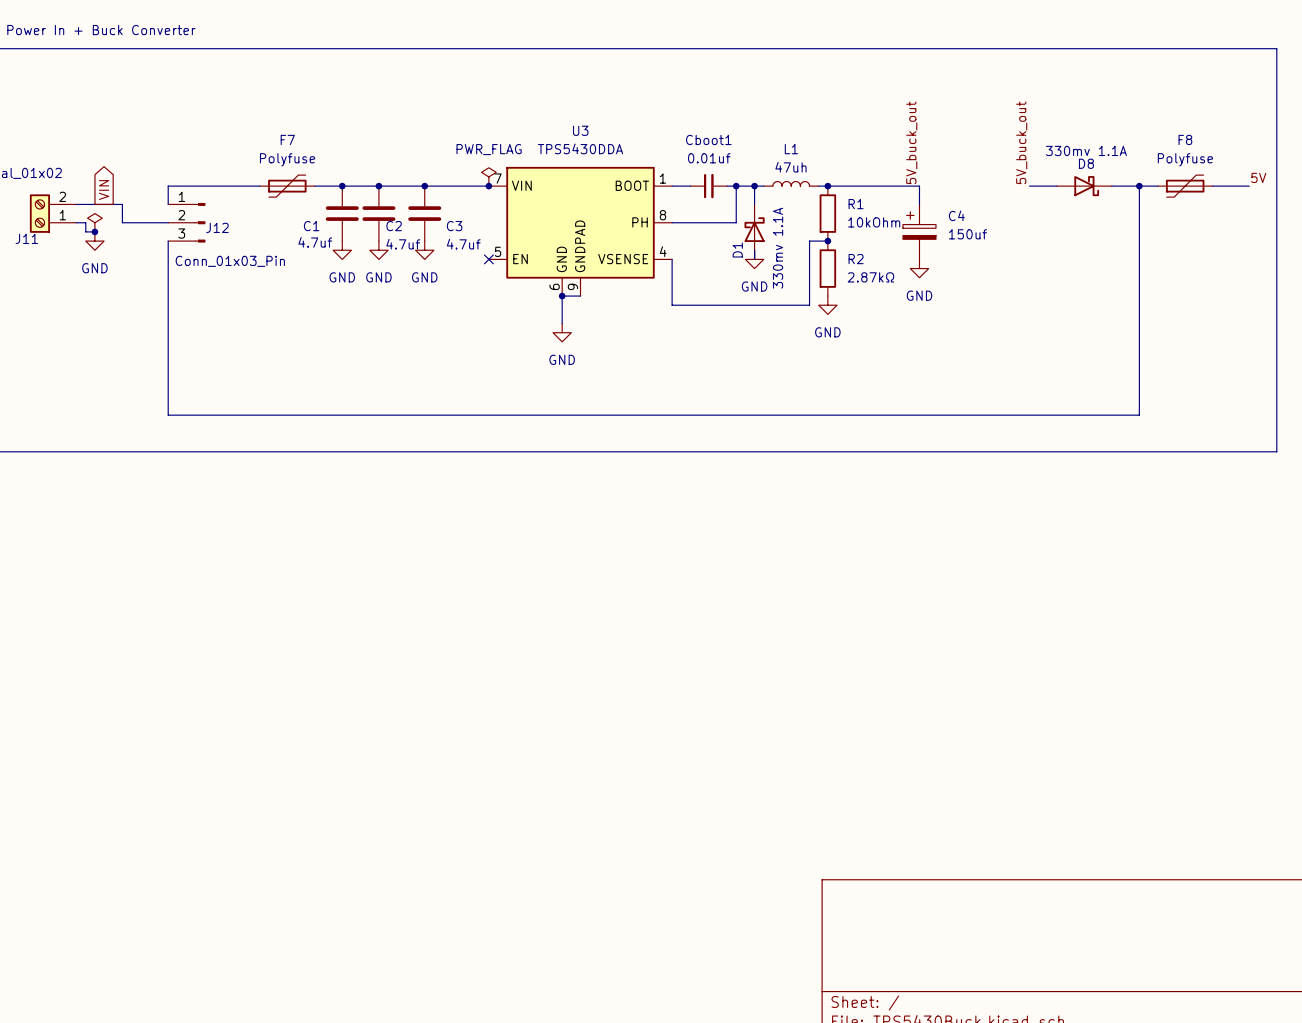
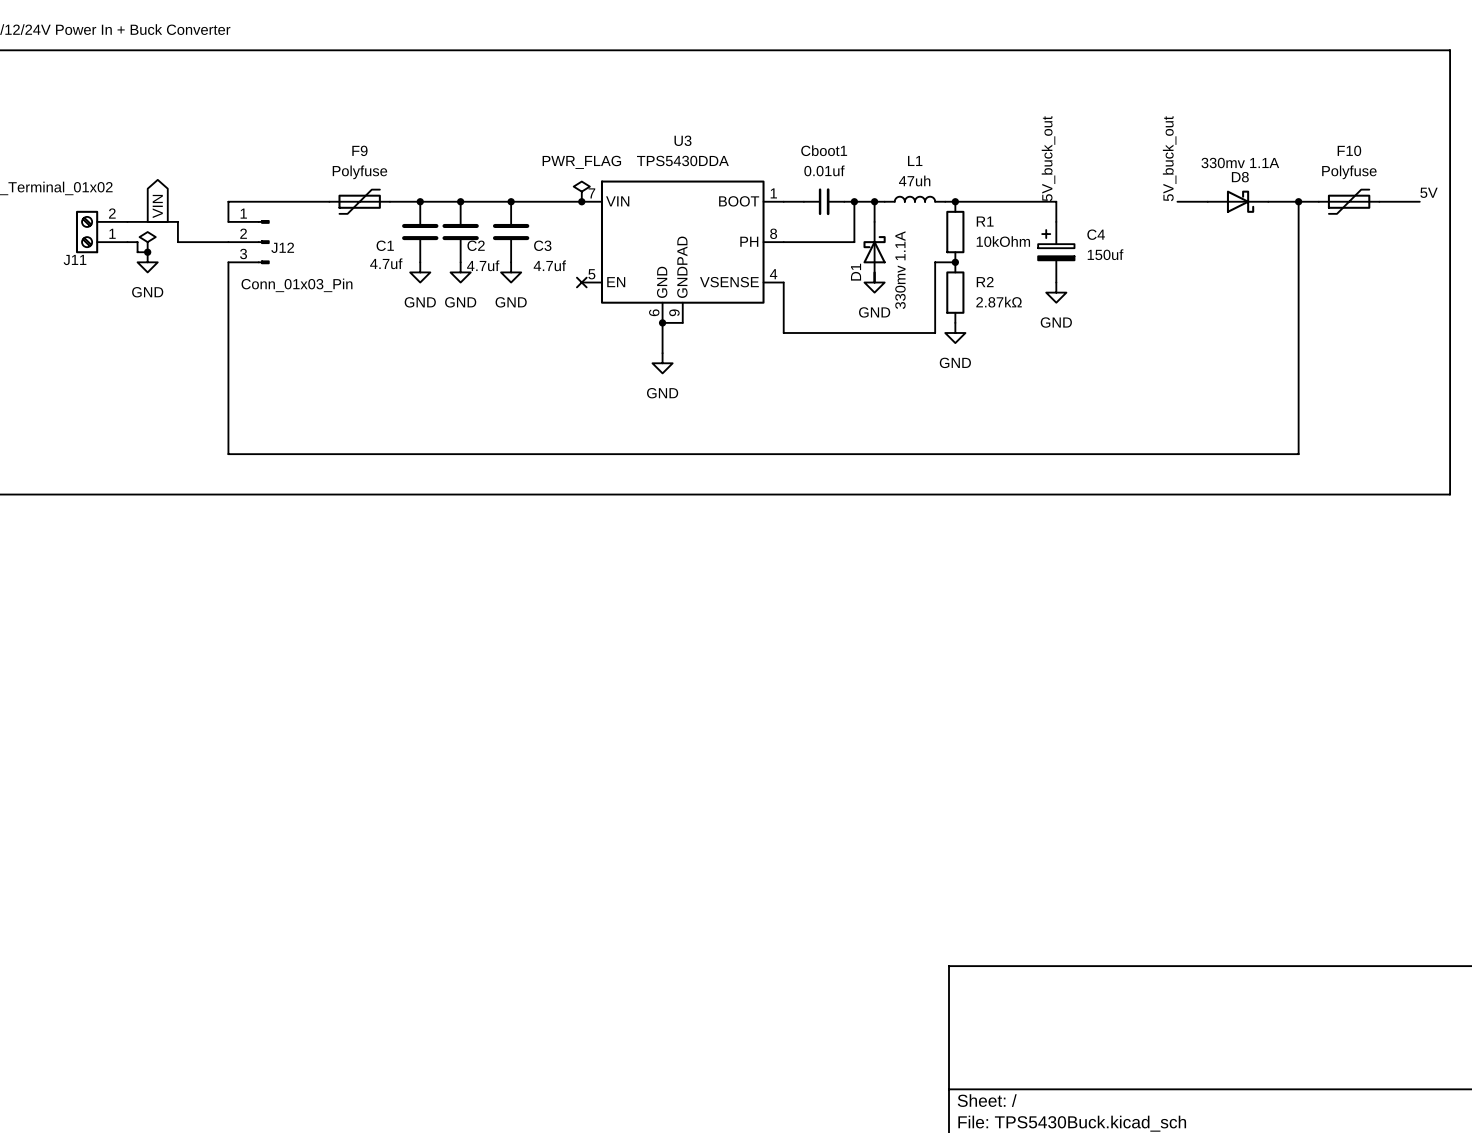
F7 name: F7 (287, 139) -> F9 (359, 150)
F8 name: F8 (1185, 139) -> F10 (1349, 150)

